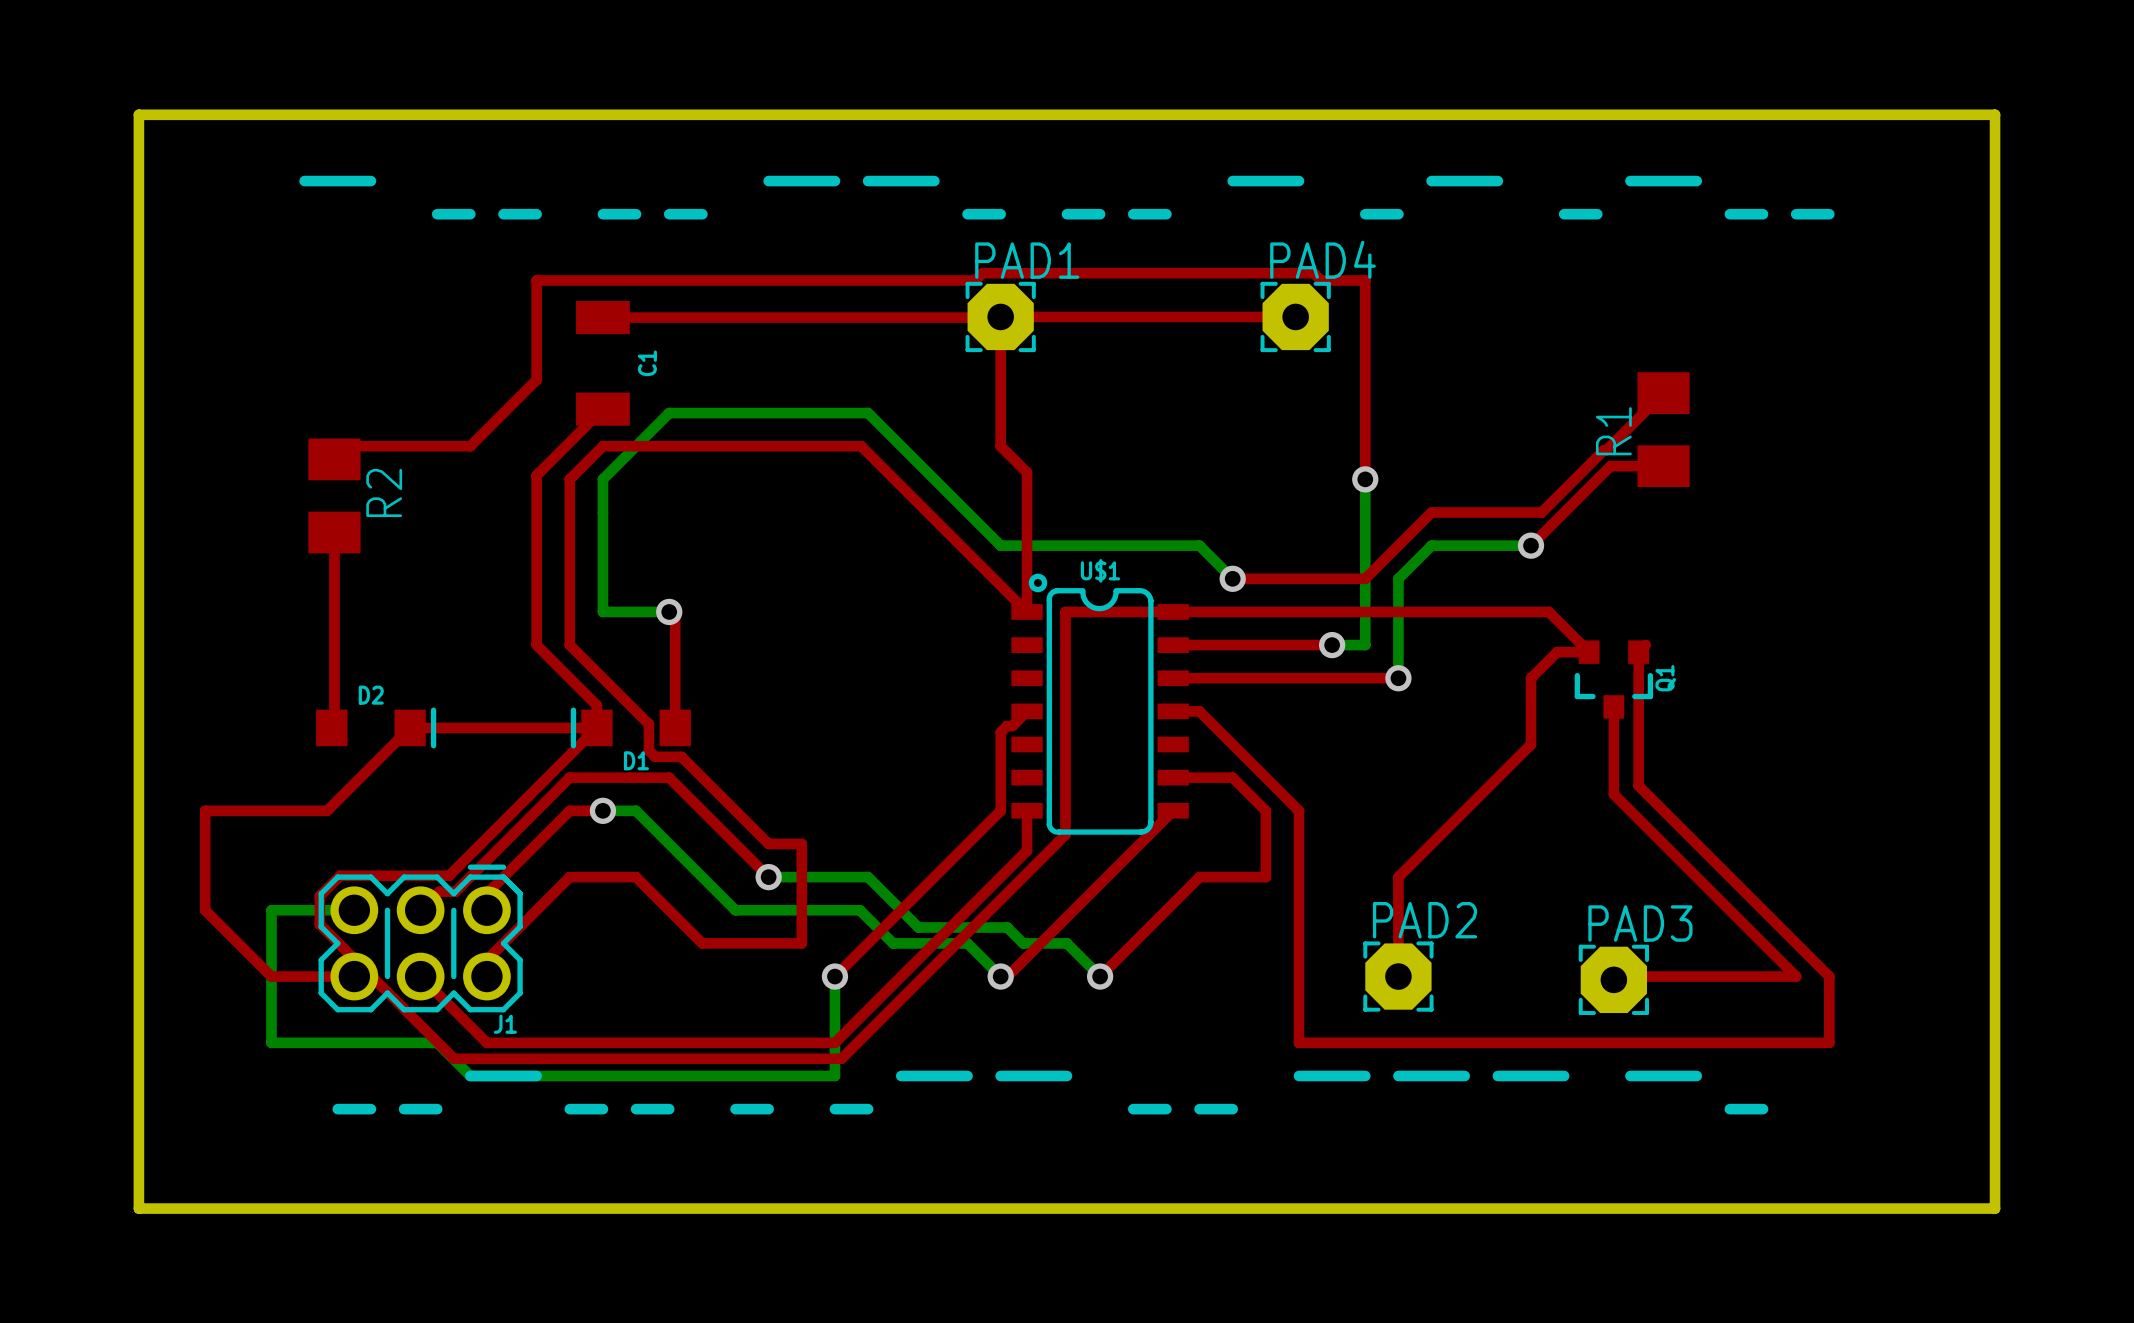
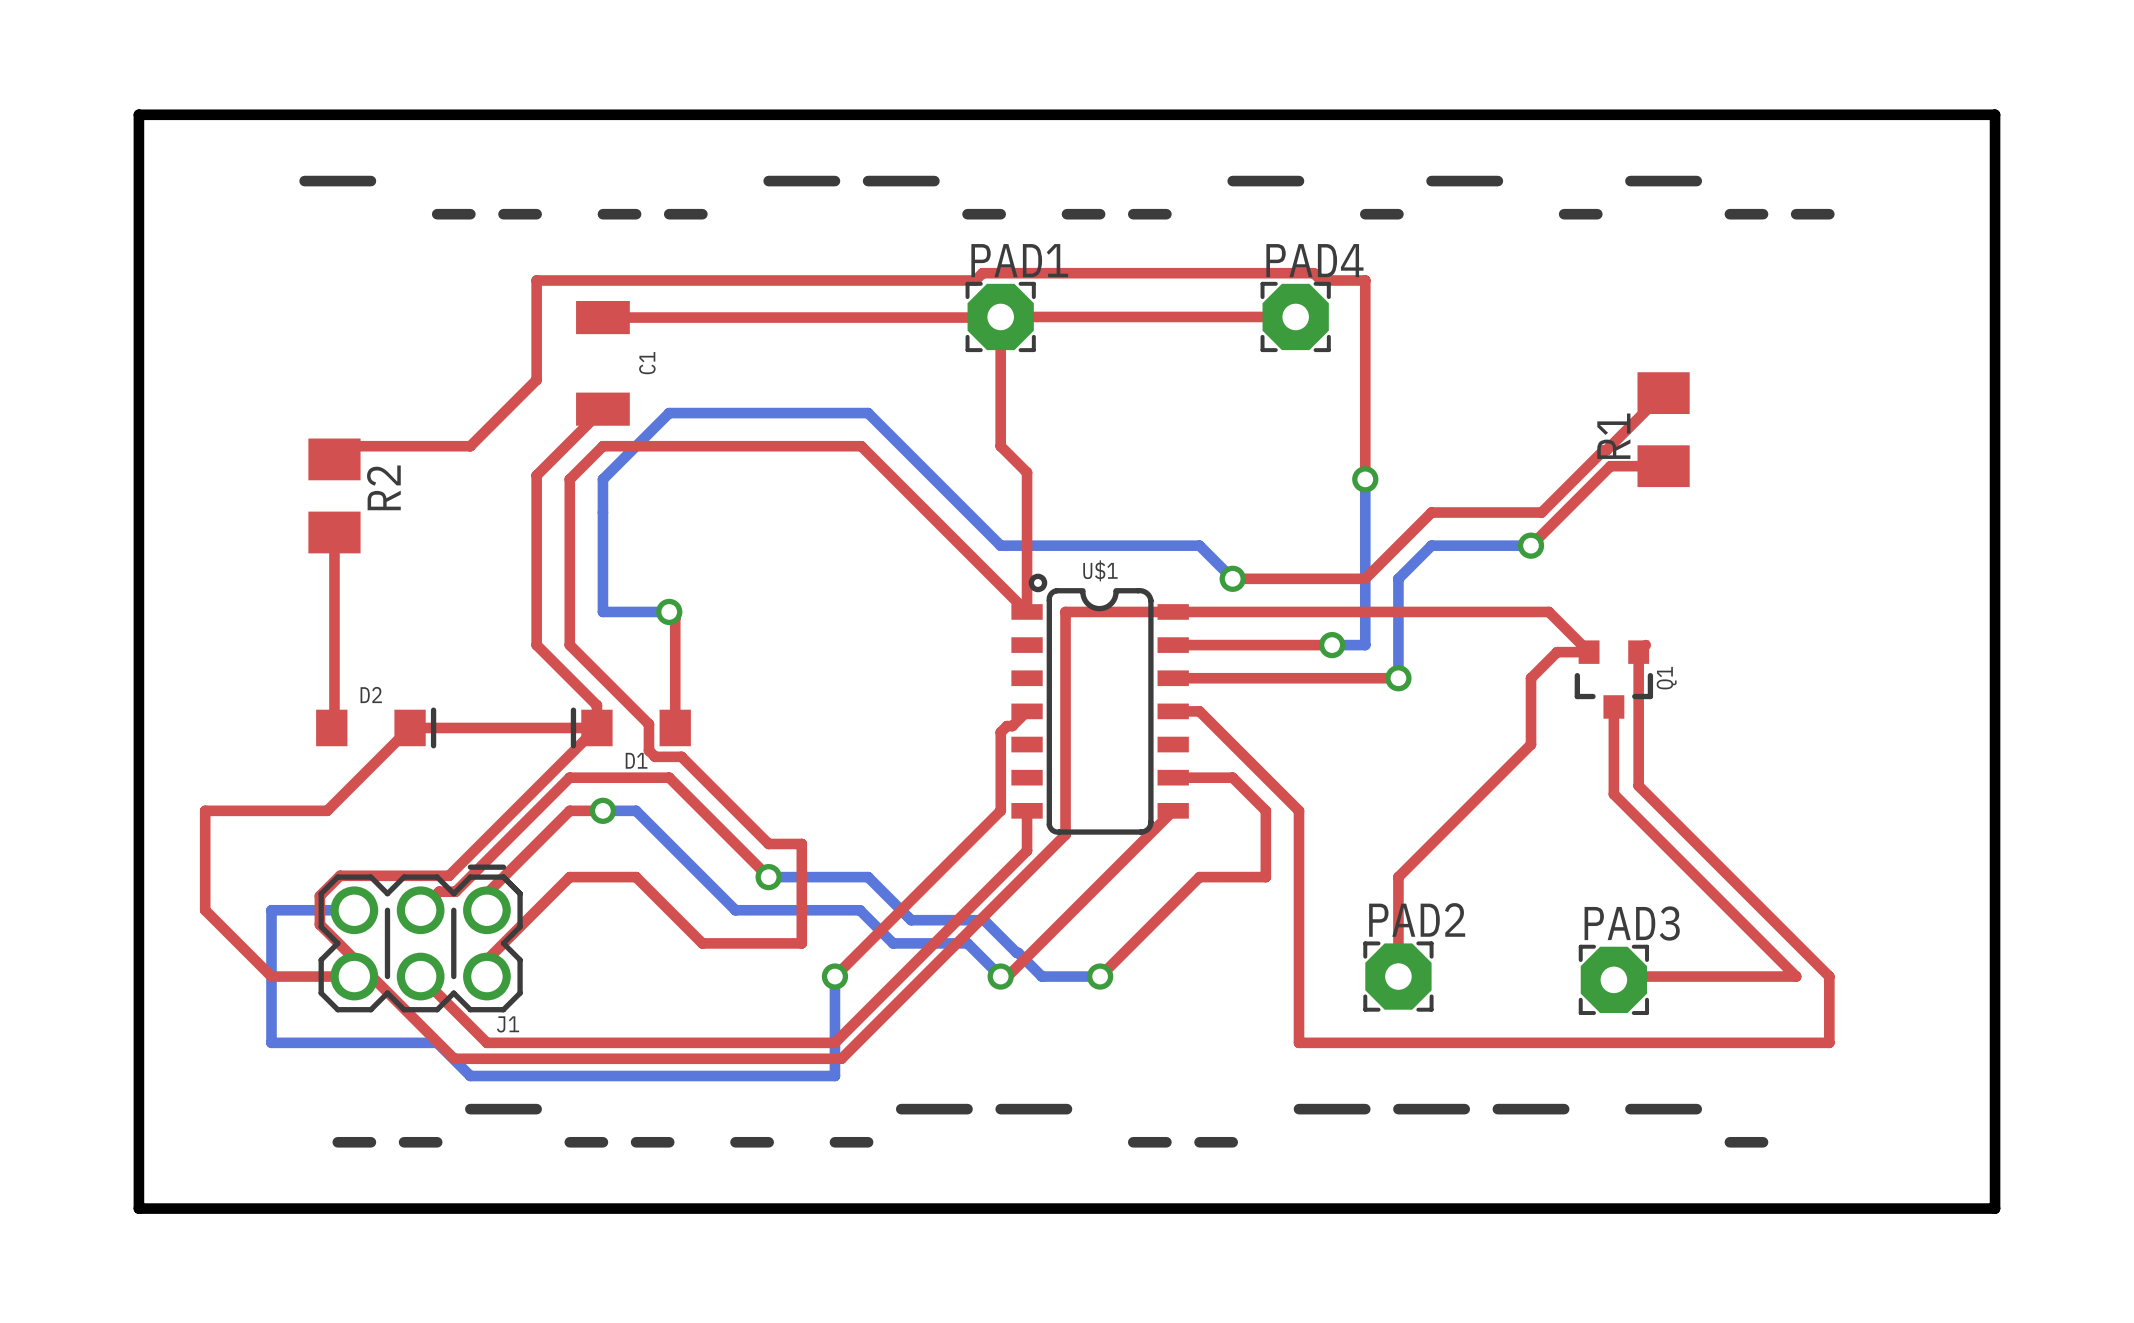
bottom track: (911, 920) (918, 927) (1007, 927) (1023, 943) (1066, 943) (1100, 976) -> (911, 920) (984, 920) (1041, 976) (1100, 976)
line: (470, 1075) (536, 1075) -> (470, 1109) (536, 1109)
line: (901, 1075) (967, 1075) -> (901, 1109) (967, 1109)
line: (1000, 1075) (1066, 1075) -> (1000, 1109) (1066, 1109)
line: (1298, 1075) (1365, 1075) -> (1298, 1109) (1365, 1109)
line: (1398, 1075) (1464, 1075) -> (1398, 1109) (1464, 1109)
line: (1497, 1075) (1564, 1075) -> (1497, 1109) (1564, 1109)
line: (1630, 1075) (1696, 1075) -> (1630, 1109) (1696, 1109)
line: (337, 1109) (370, 1109) -> (337, 1142) (370, 1142)
line: (404, 1109) (437, 1109) -> (404, 1142) (437, 1142)
line: (569, 1109) (602, 1109) -> (569, 1142) (602, 1142)
line: (636, 1109) (669, 1109) -> (636, 1142) (669, 1142)
line: (735, 1109) (768, 1109) -> (735, 1142) (768, 1142)
line: (834, 1109) (868, 1109) -> (834, 1142) (868, 1142)
line: (1133, 1109) (1166, 1109) -> (1133, 1142) (1166, 1142)
line: (1199, 1109) (1232, 1109) -> (1199, 1142) (1232, 1142)
line: (1729, 1109) (1763, 1109) -> (1729, 1142) (1763, 1142)

